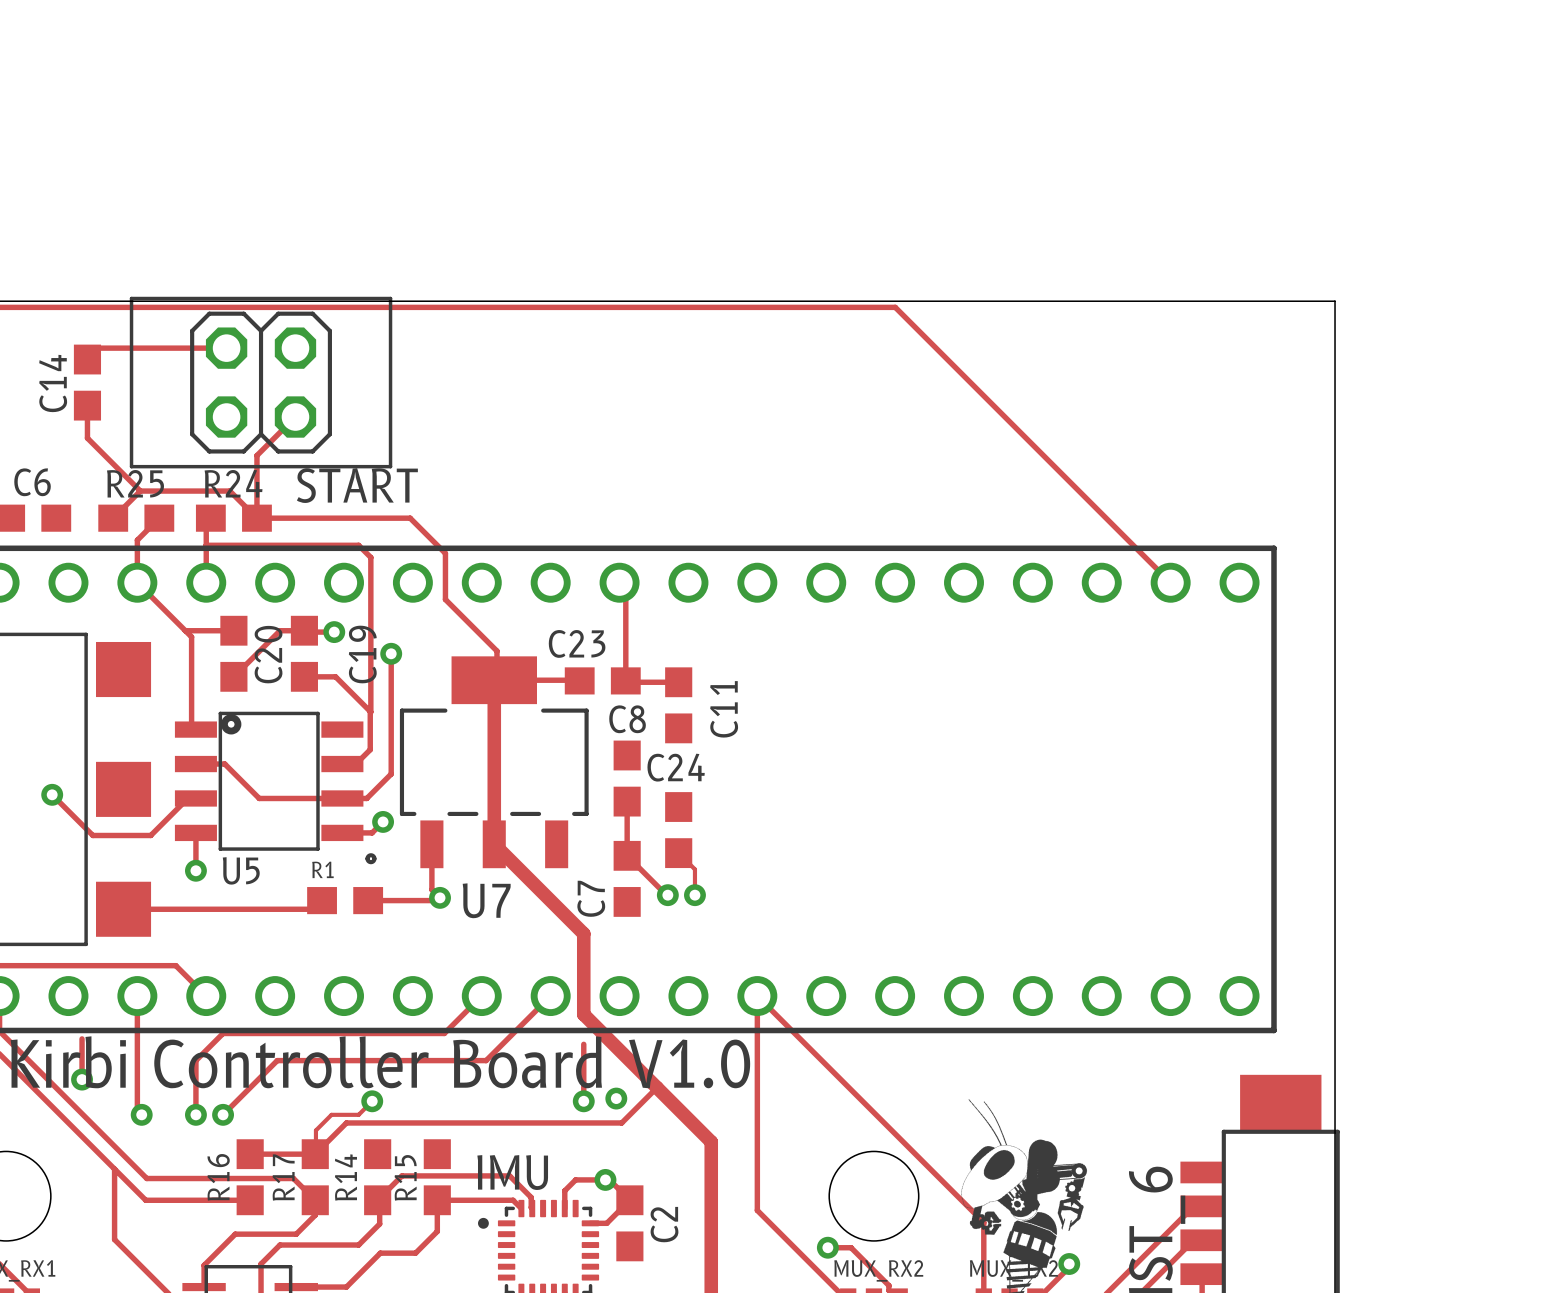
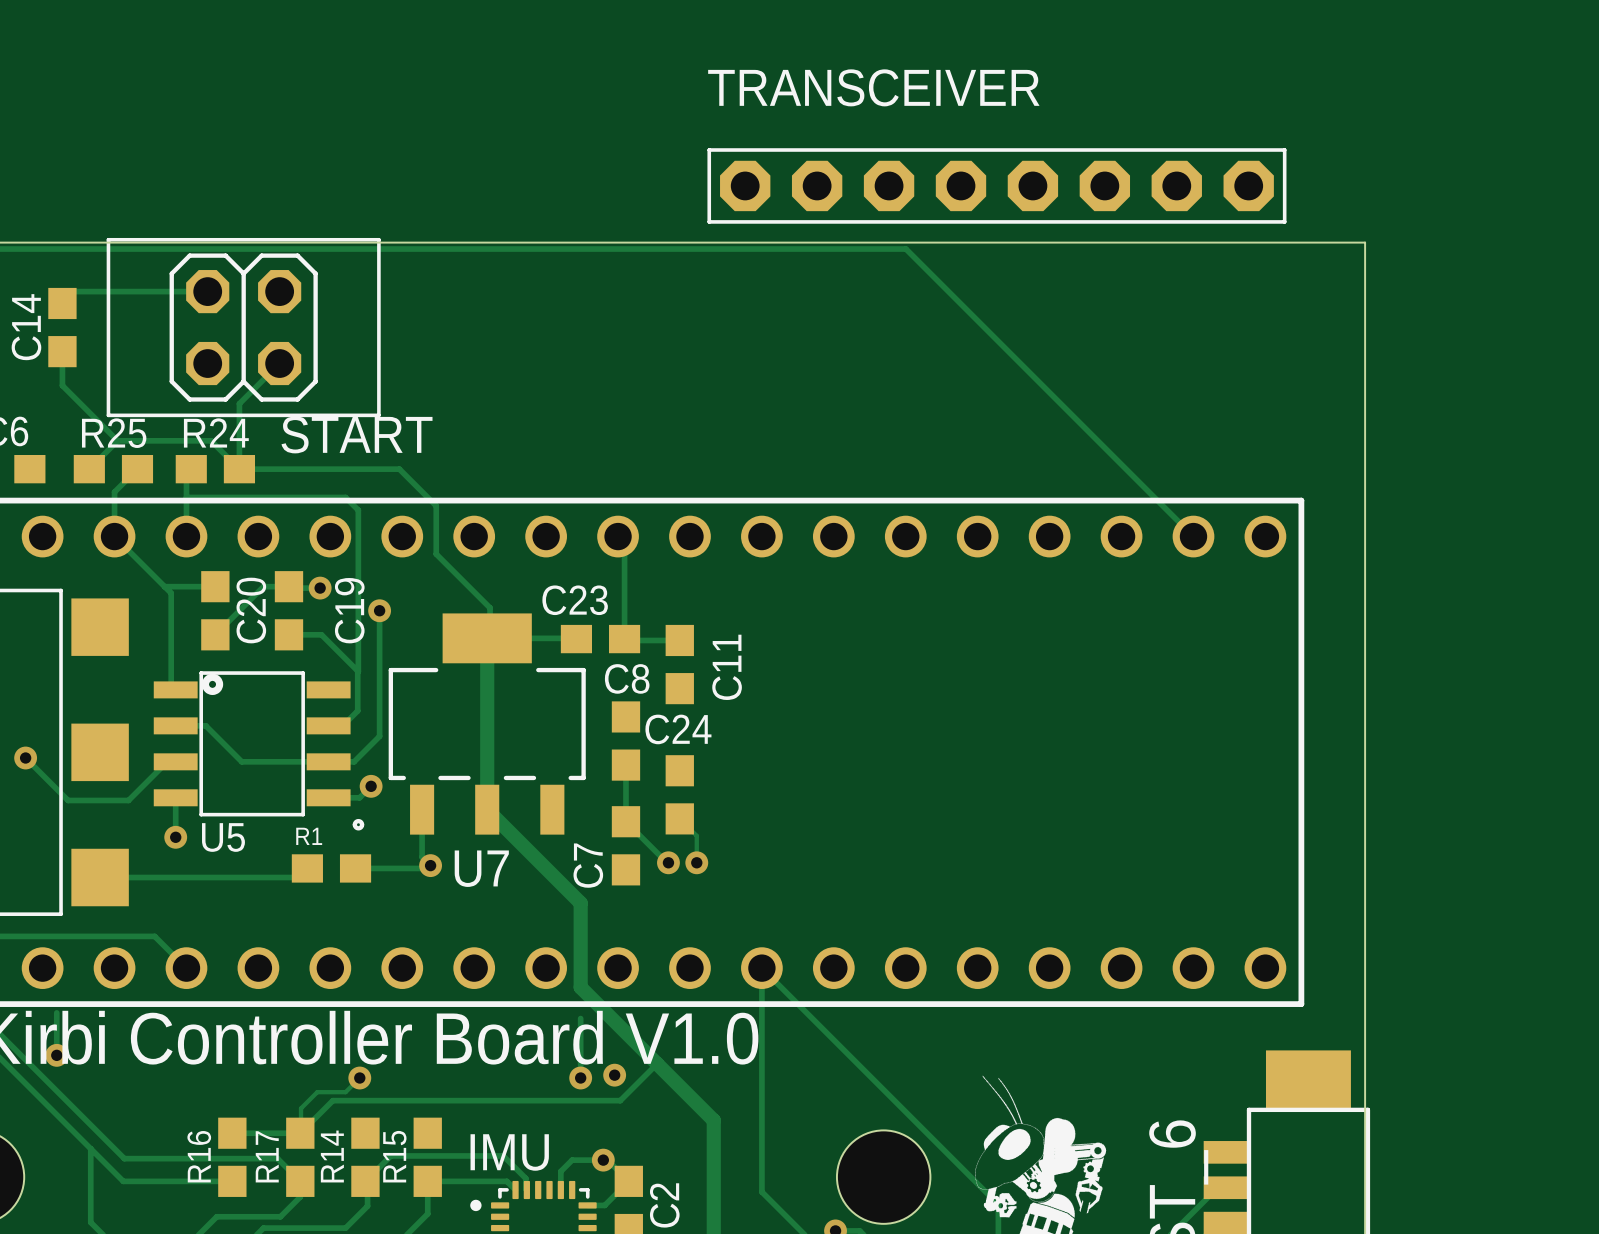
TRANSCEIVER: none -> (996, 185)
track: (137, 996) (137, 1110) (141, 1114) -> none
track: (481, 996) (444, 1033) (223, 1033) (195, 1060) (195, 1114) -> none
track: (550, 996) (486, 1060) (277, 1060) (223, 1114) -> none
via: (141, 1114) -> none
via: (195, 1114) -> none
via: (223, 1114) -> none

